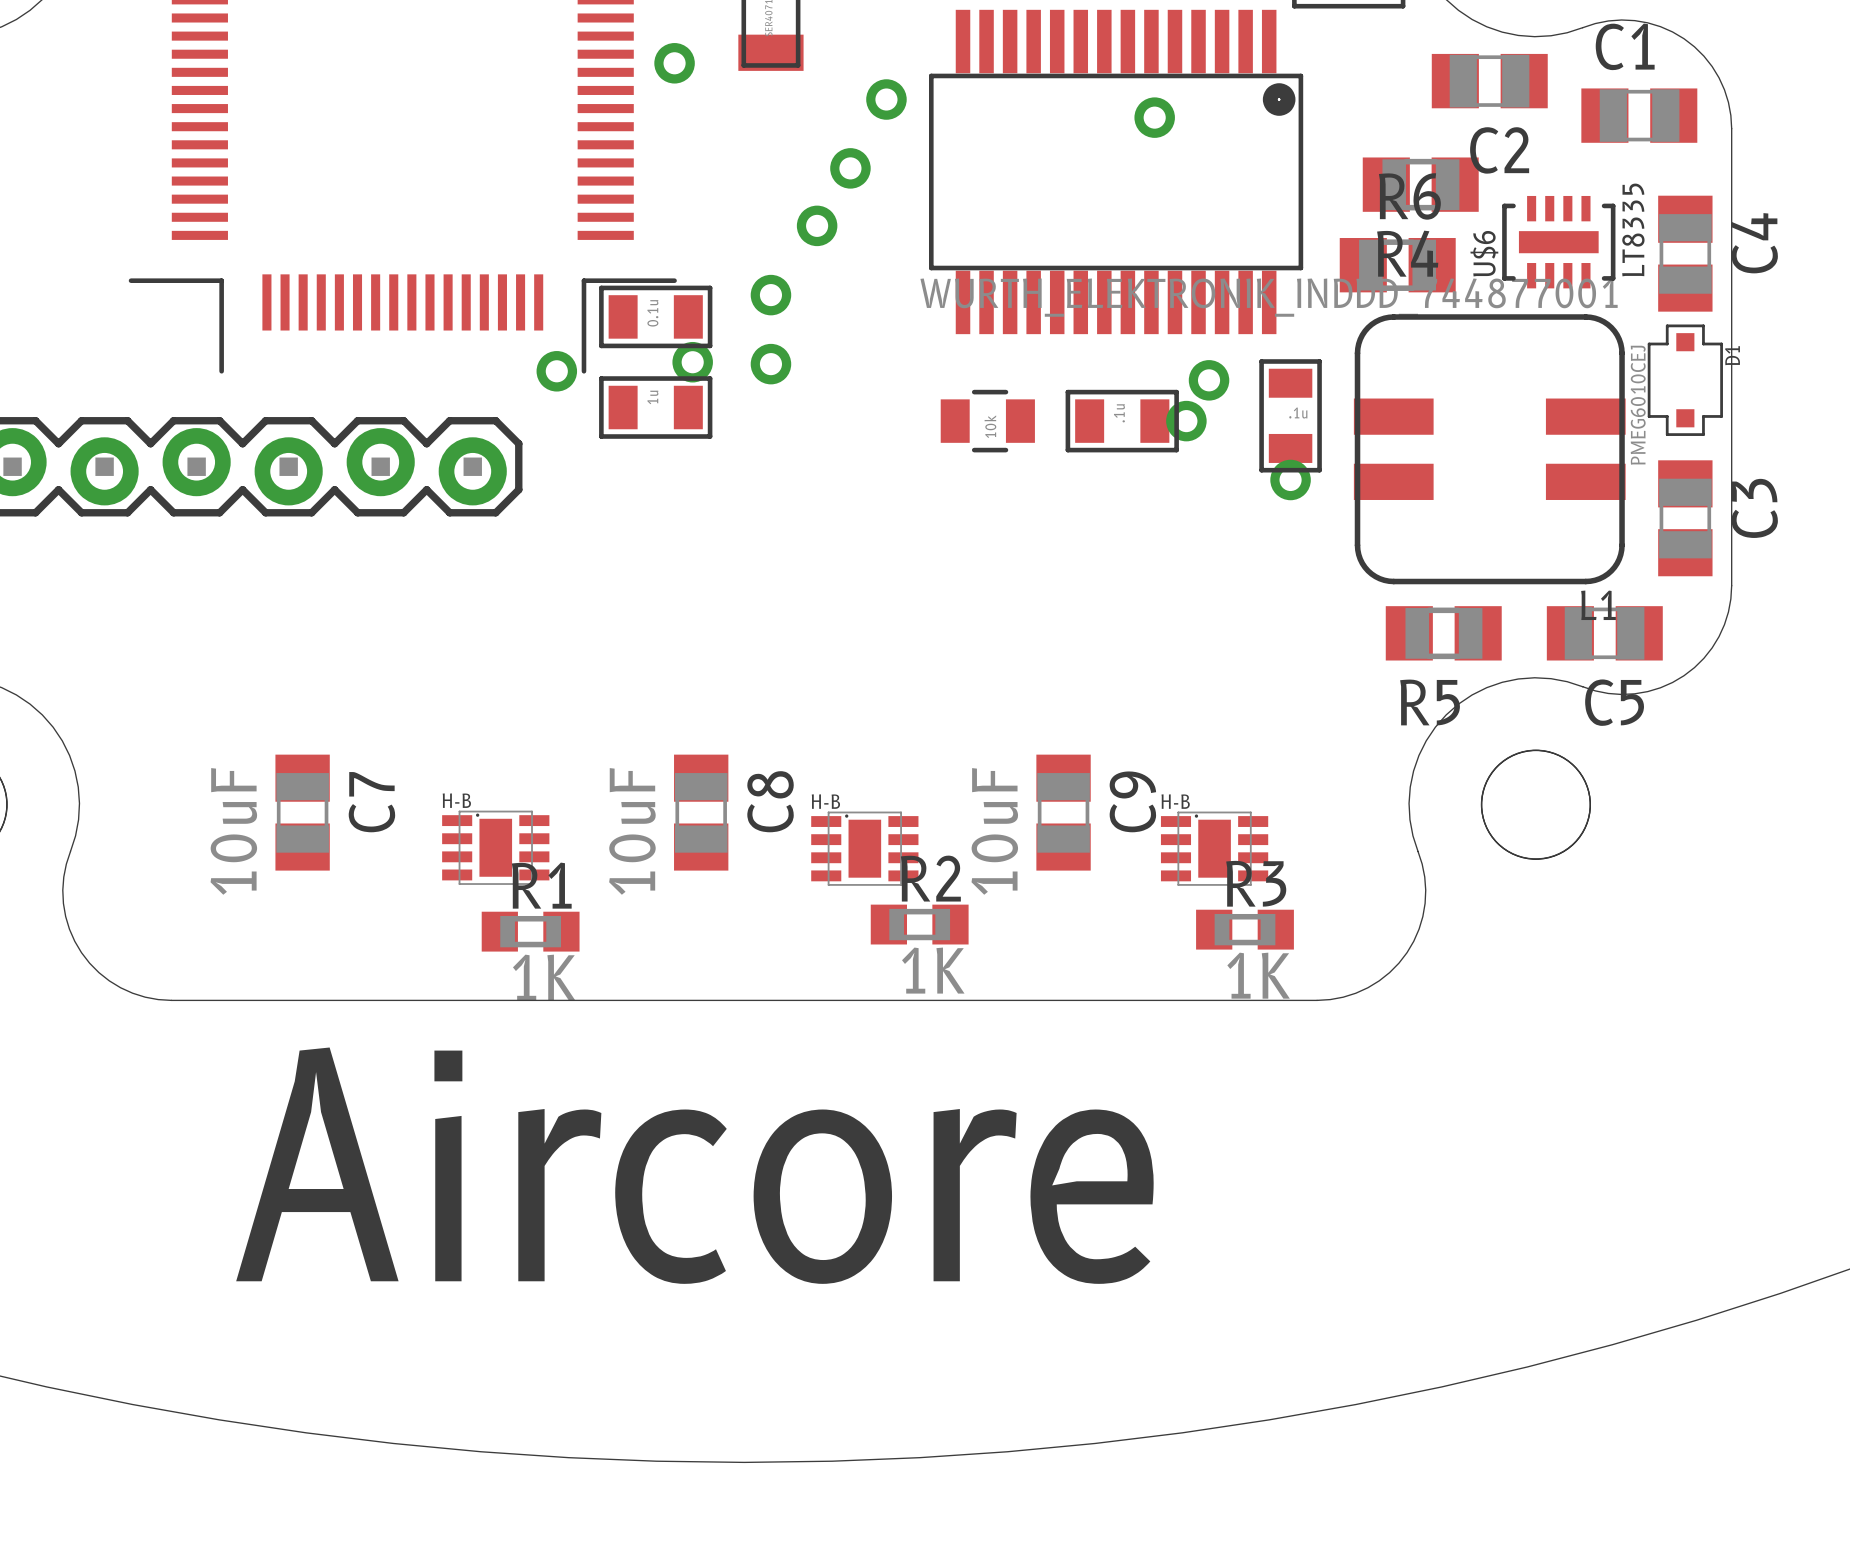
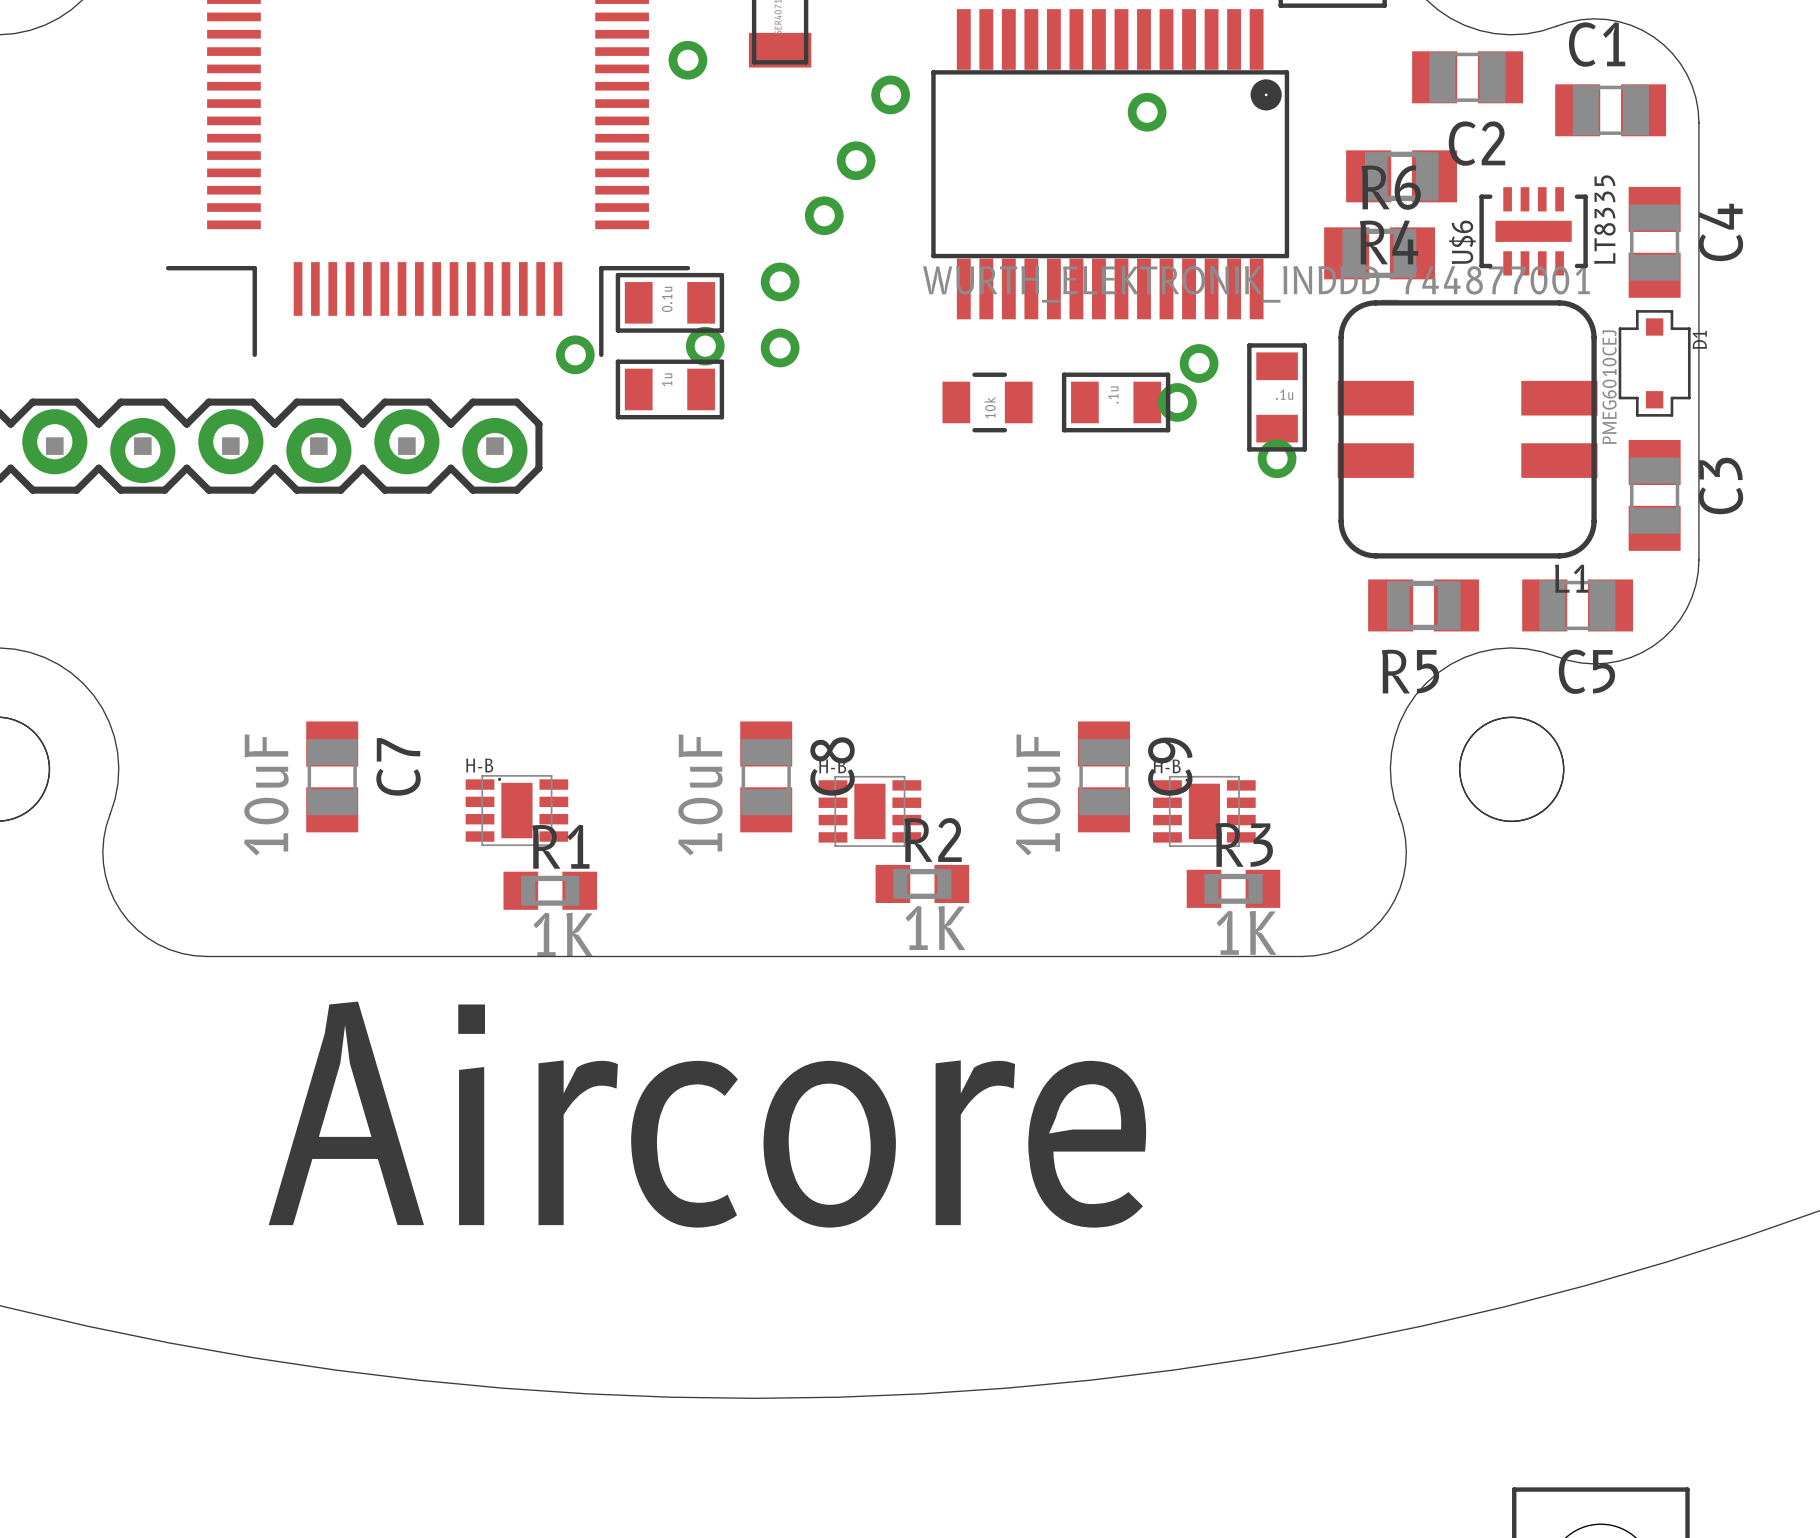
C8 position: (701, 812) -> (766, 776)
C9 position: (1063, 812) -> (1103, 776)

